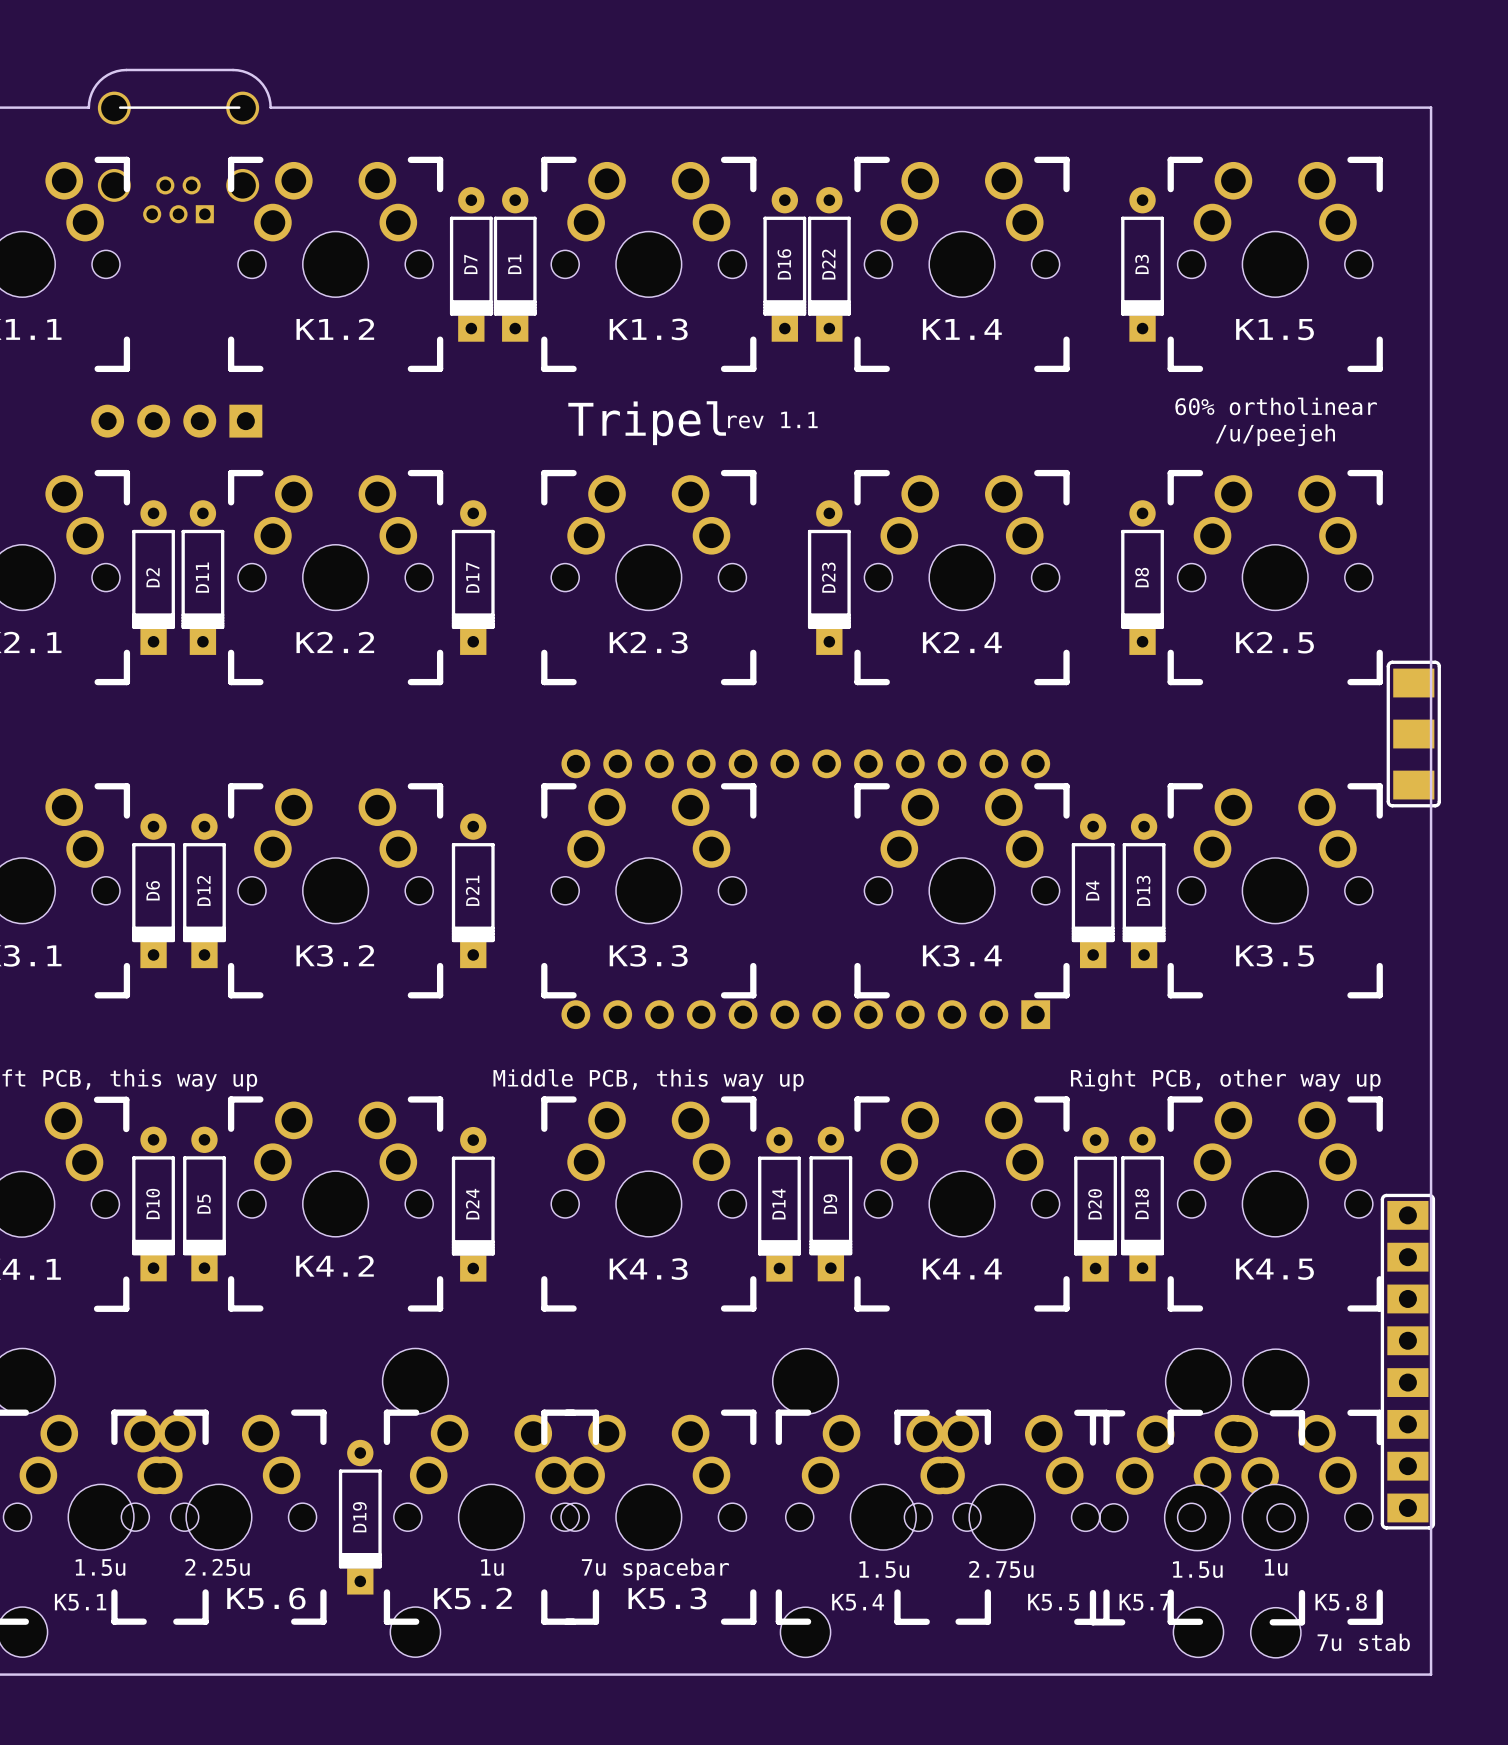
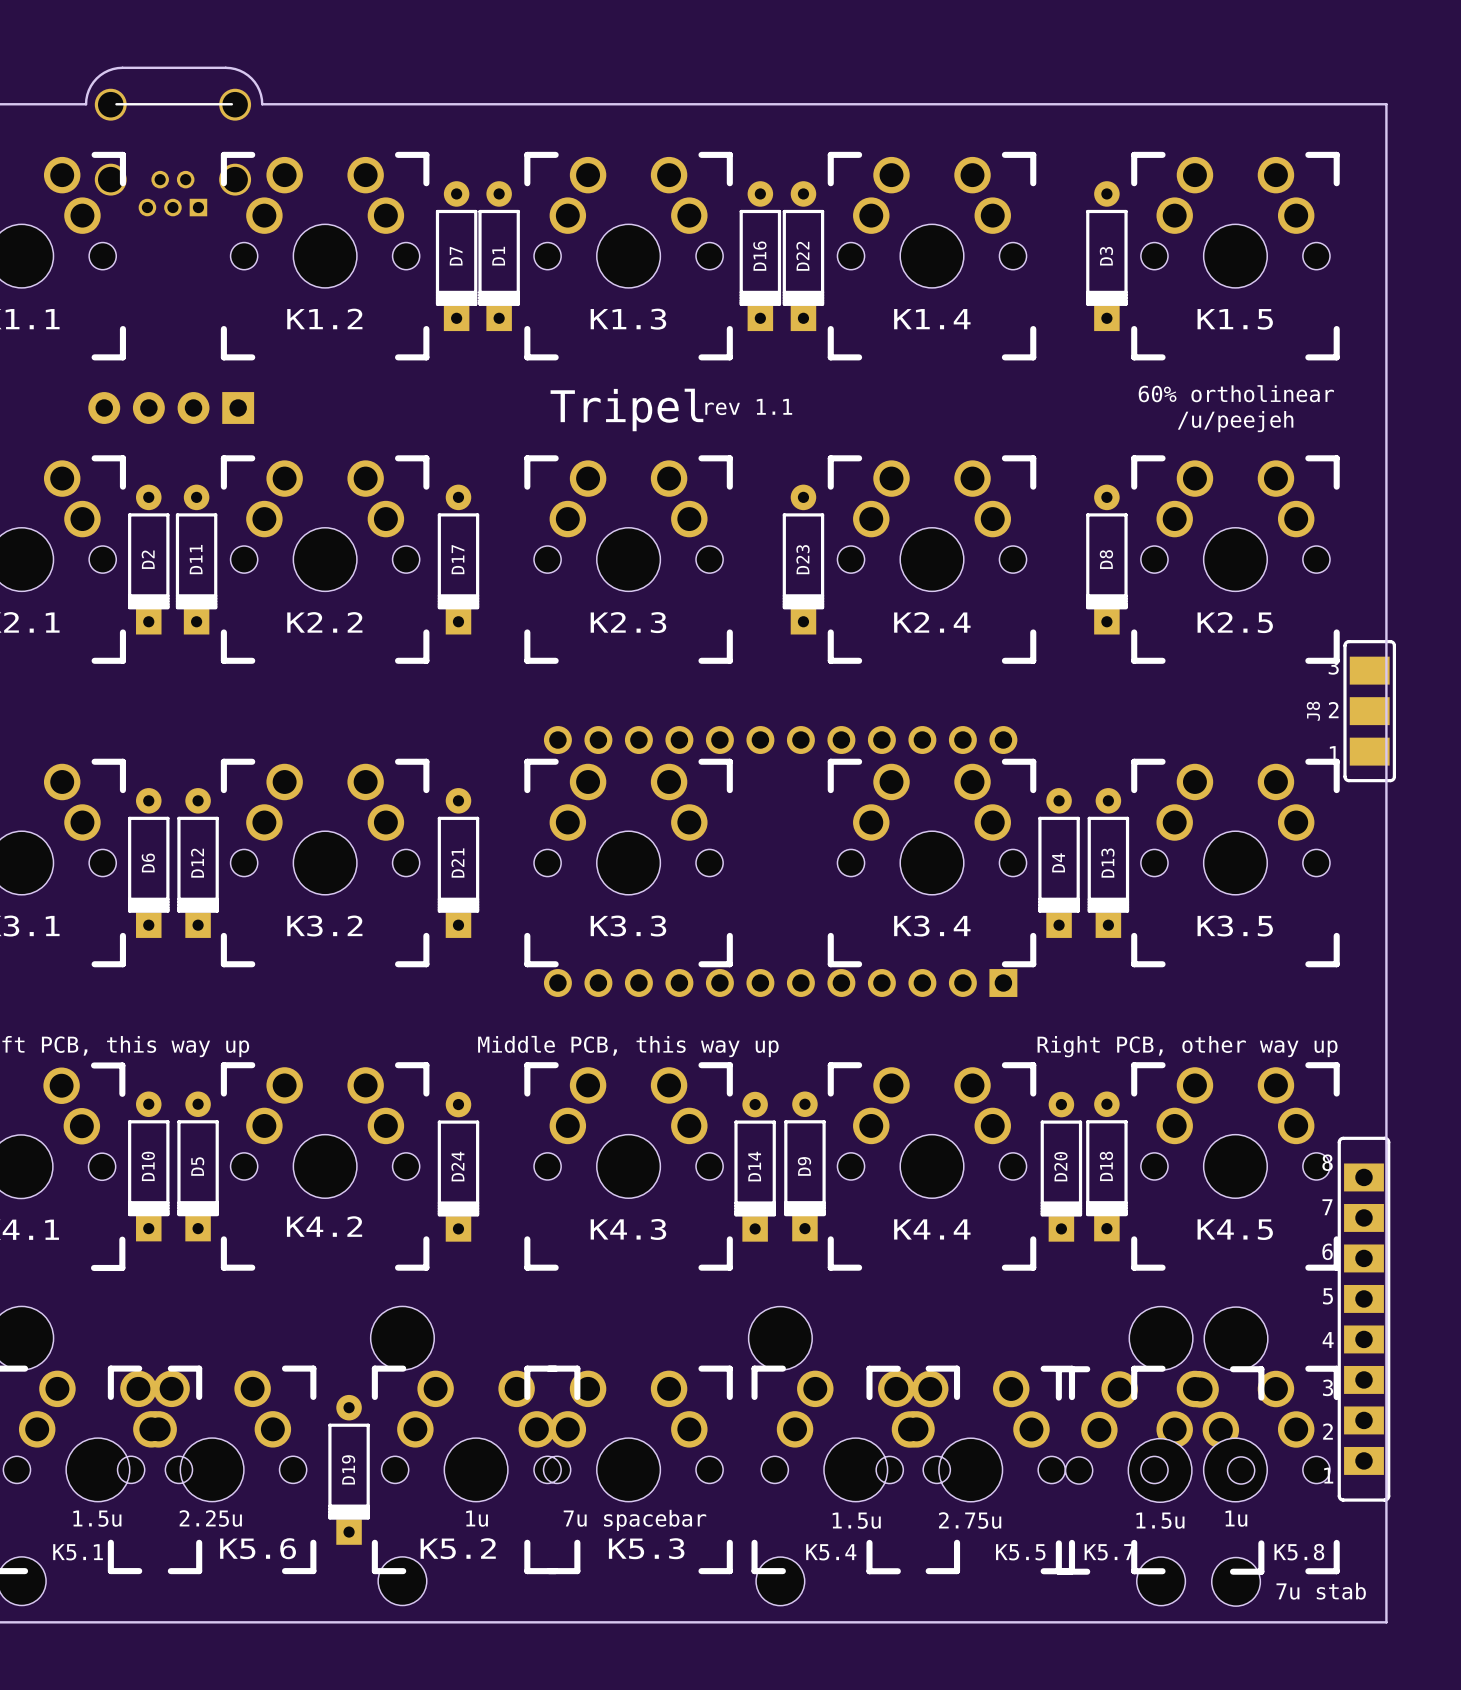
part: (1413, 734) -> none
J8: none -> (1369, 711)
part footprint: [1380, 1193, 1436, 1530] -> [1337, 1136, 1391, 1502]

